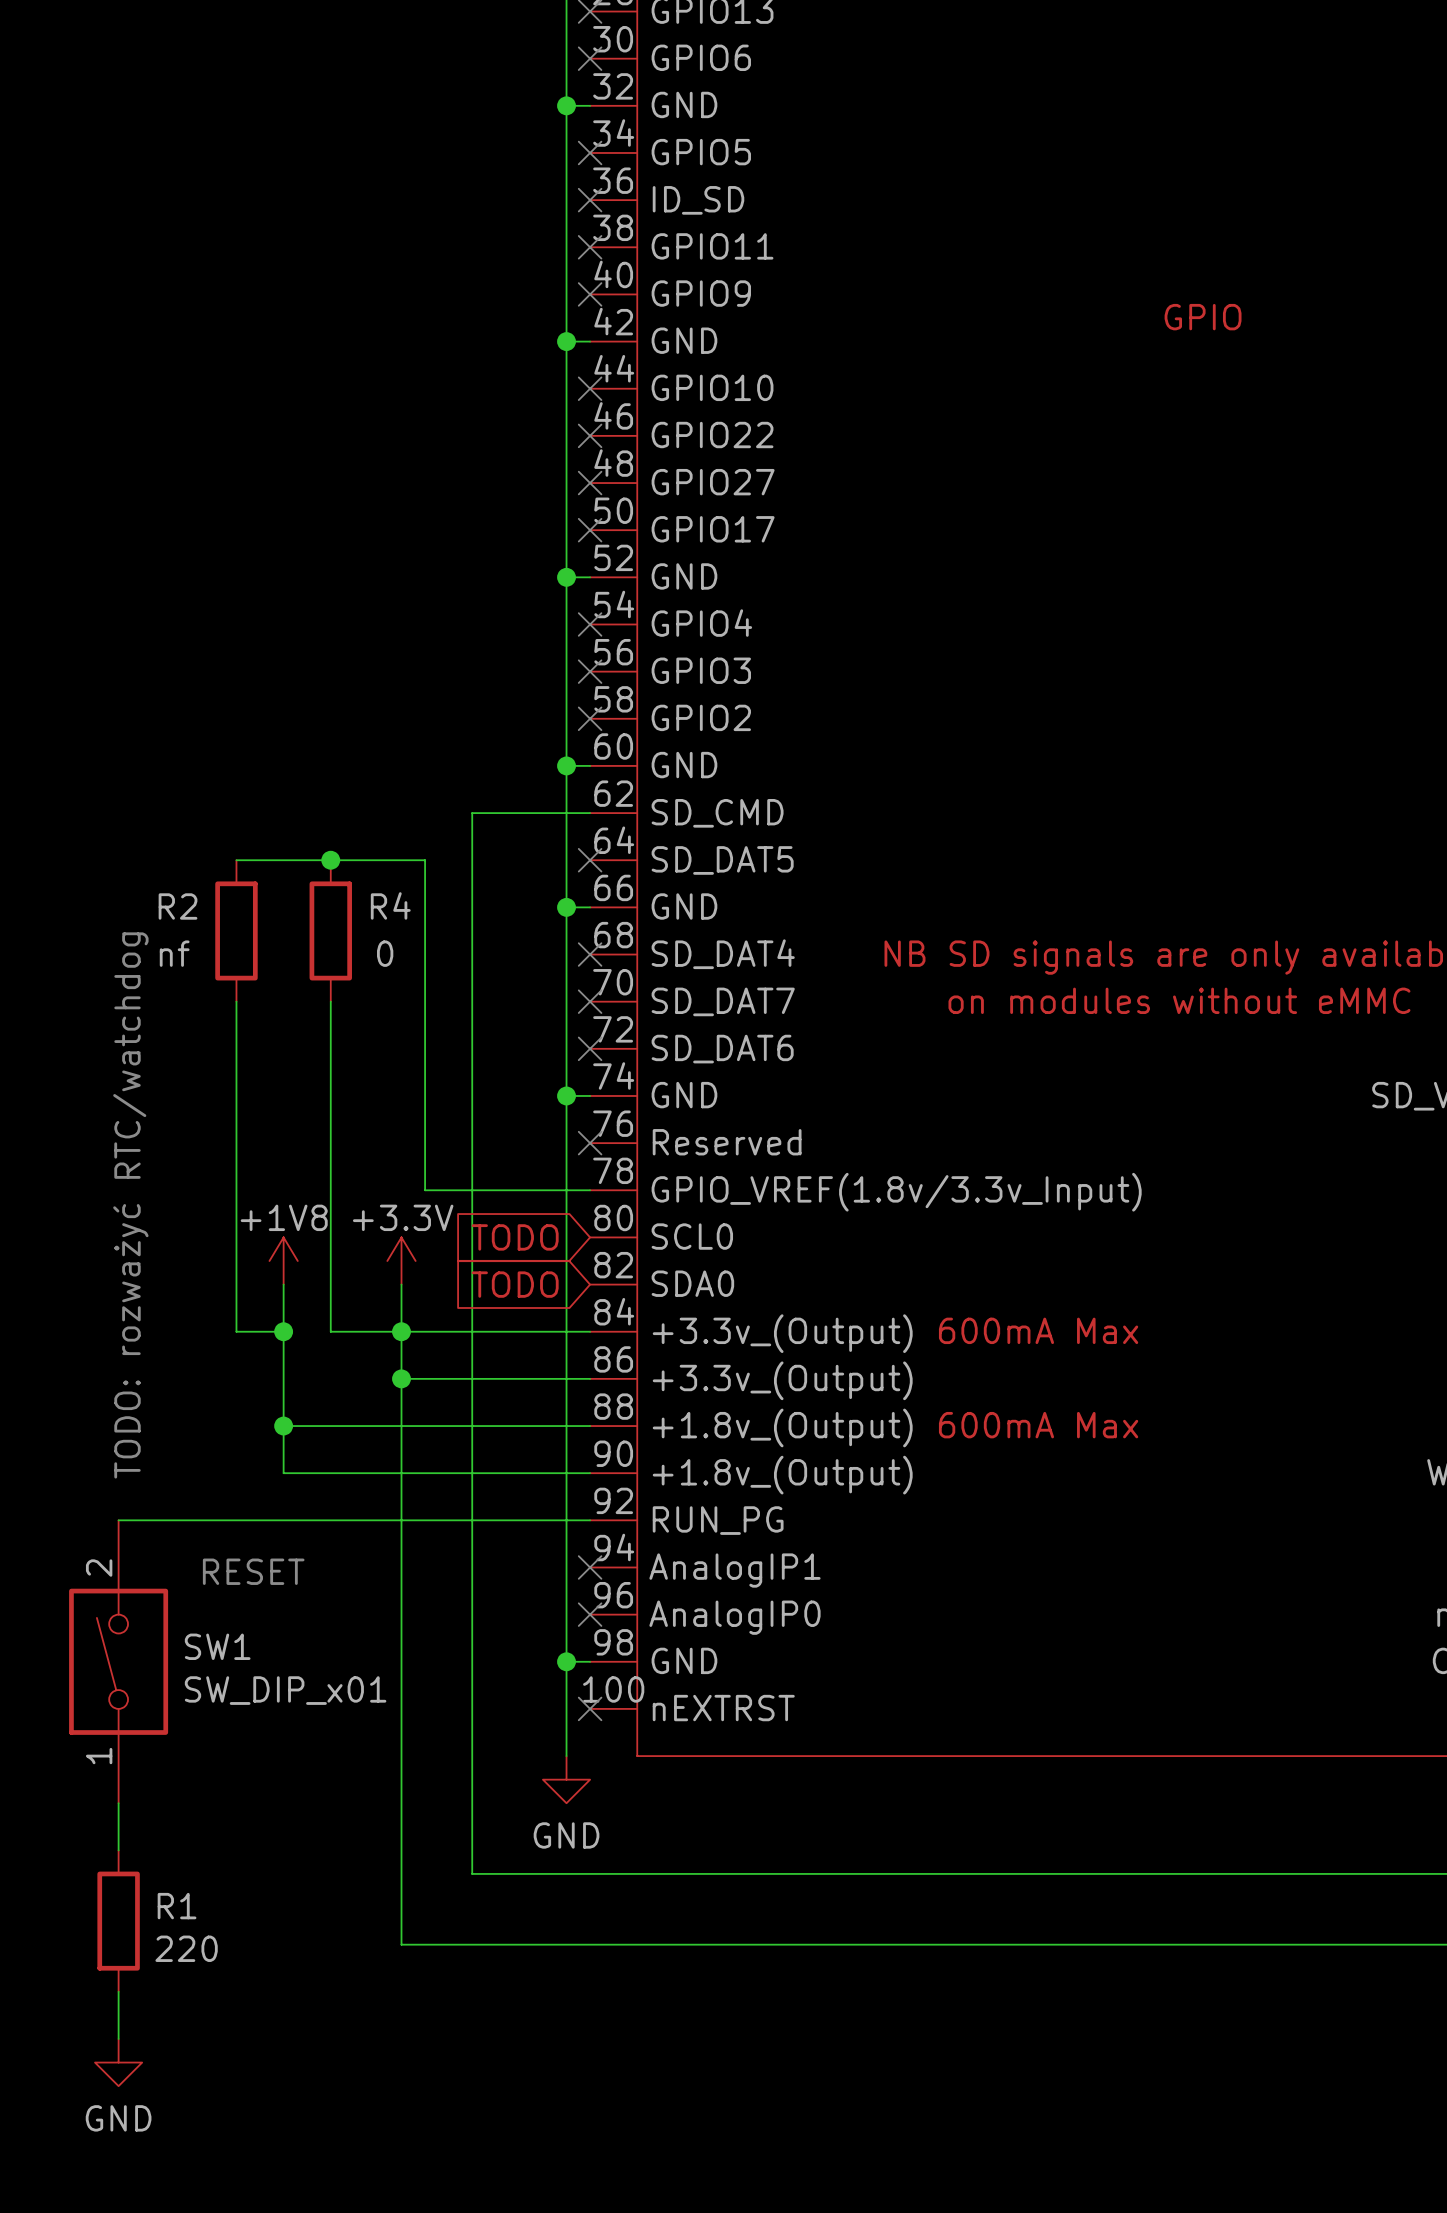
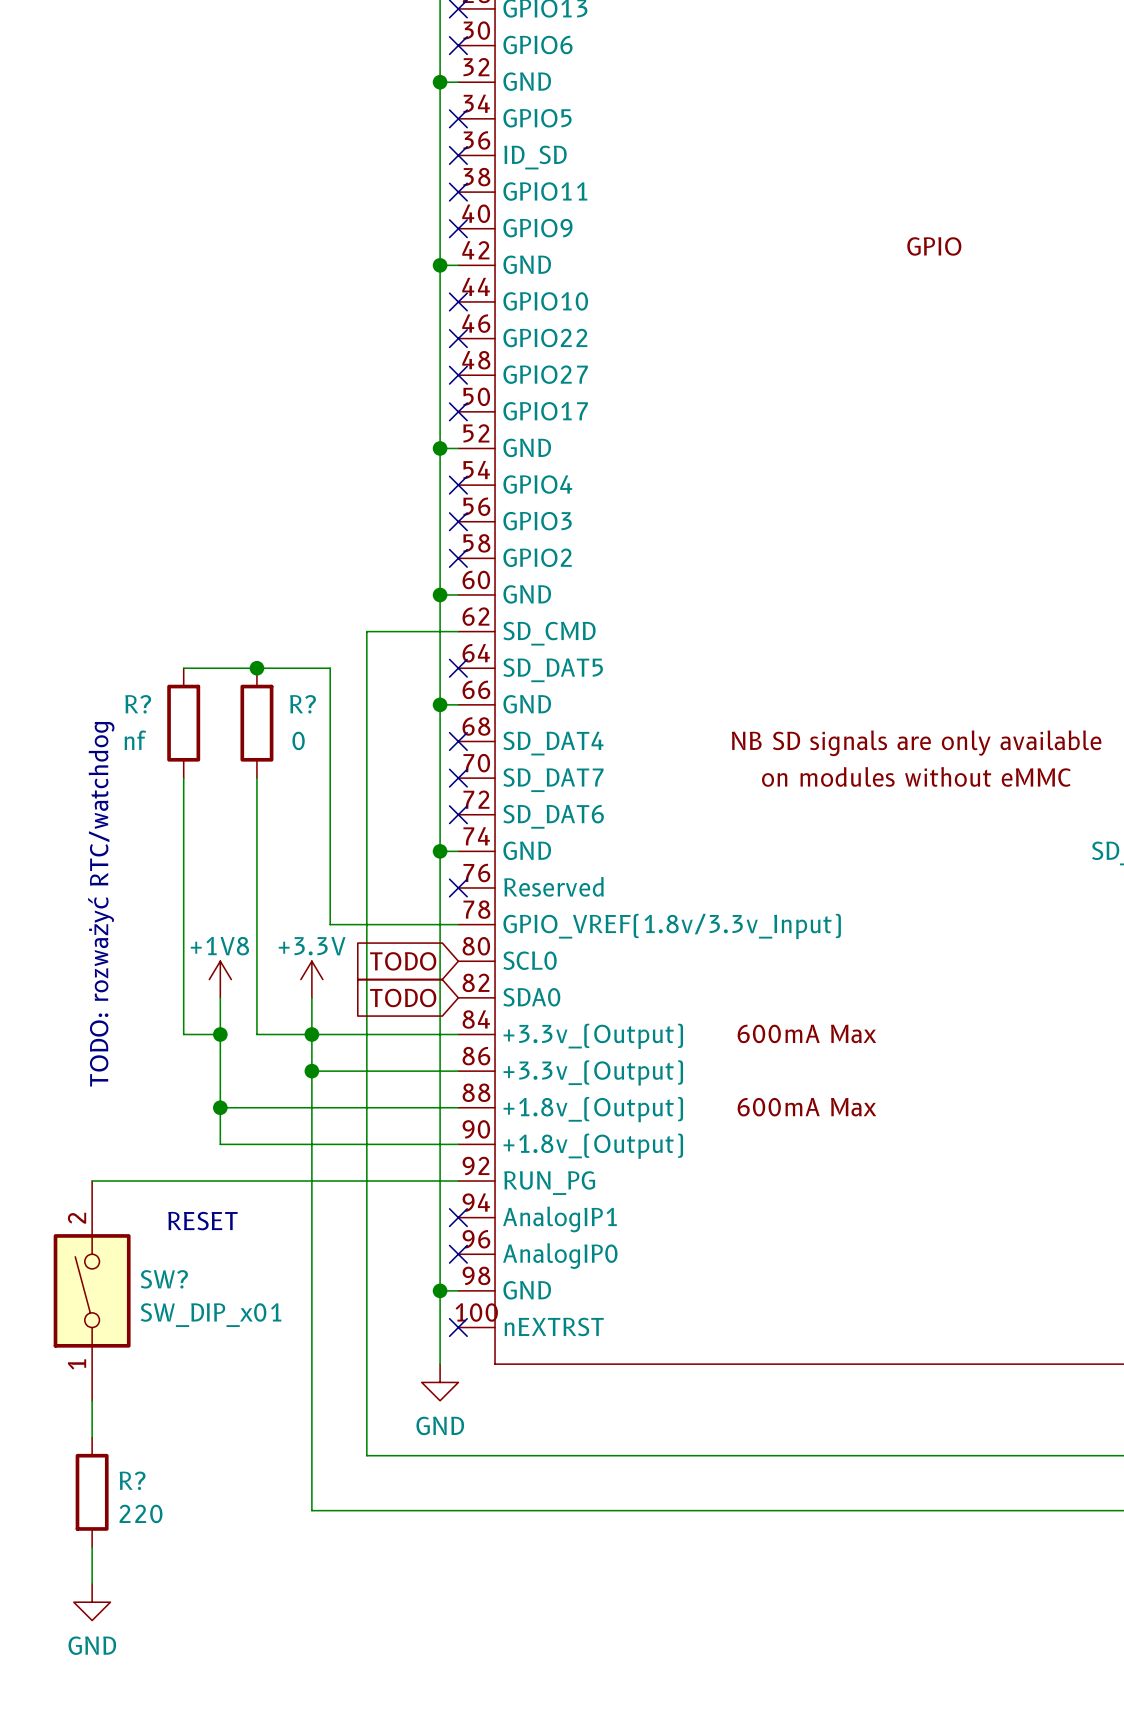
R4 name: R4 (390, 905) -> R? (303, 704)
R2 name: R2 (178, 906) -> R? (138, 704)
SW1 name: SW1 (217, 1646) -> SW? (164, 1279)
R1 name: R1 (177, 1906) -> R? (132, 1480)

